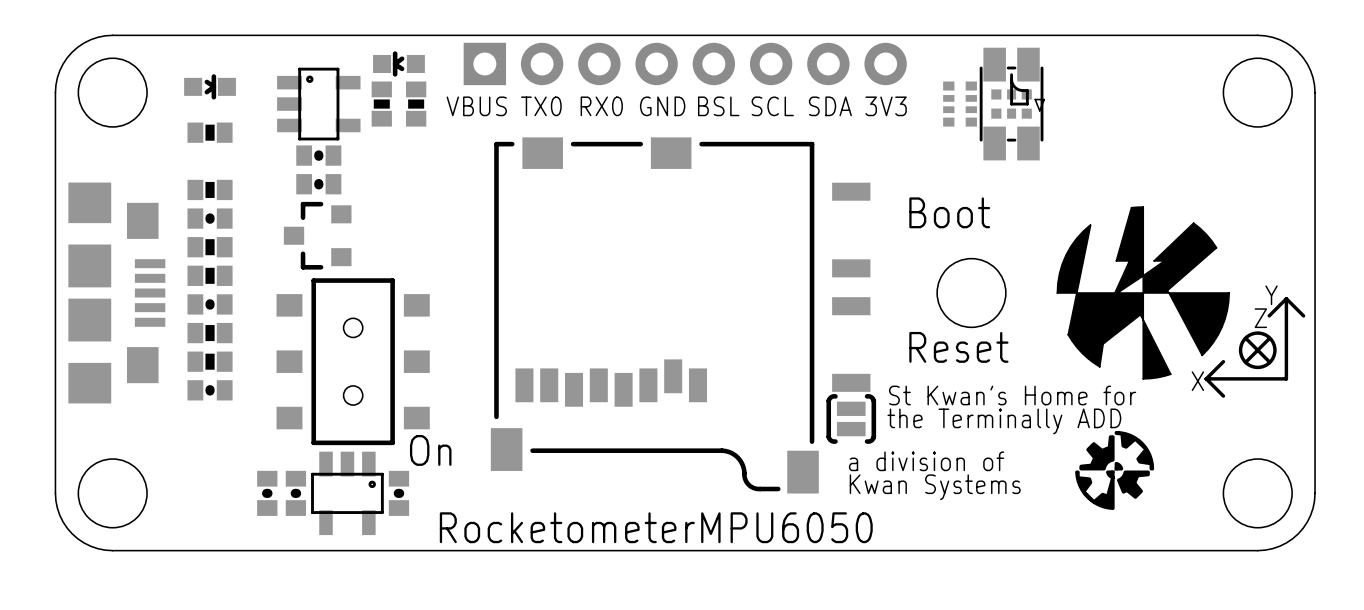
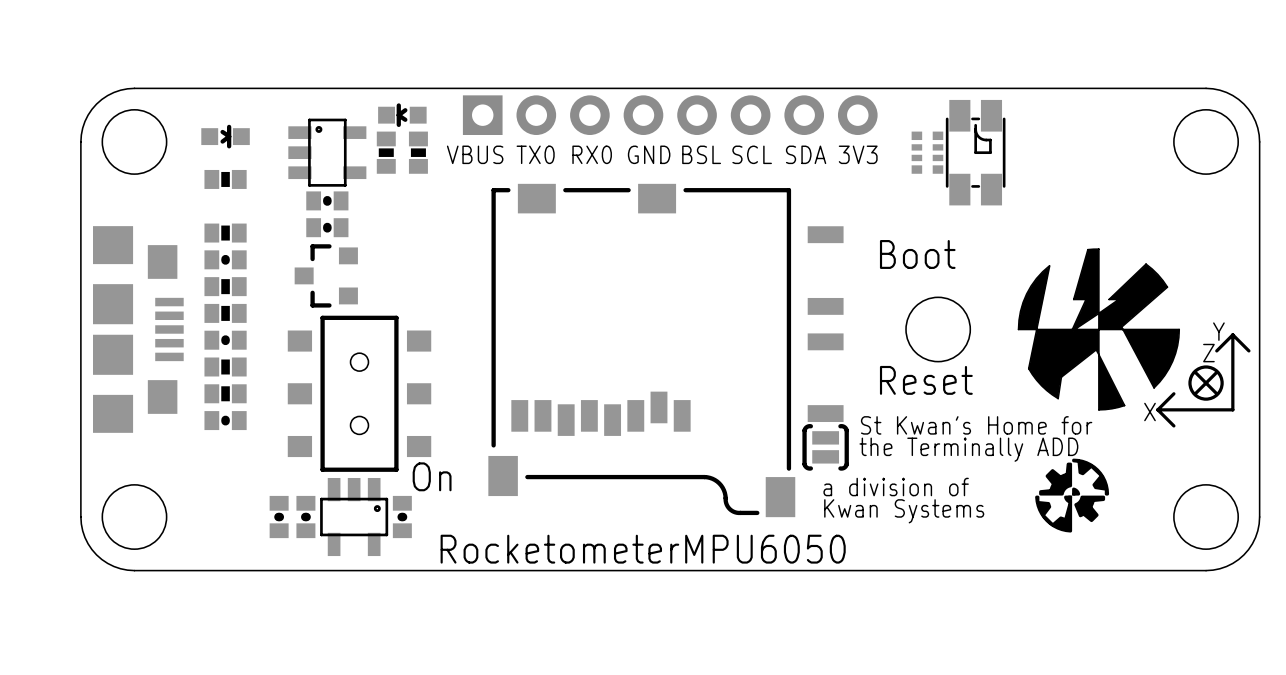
part: (1018, 104) -> none

